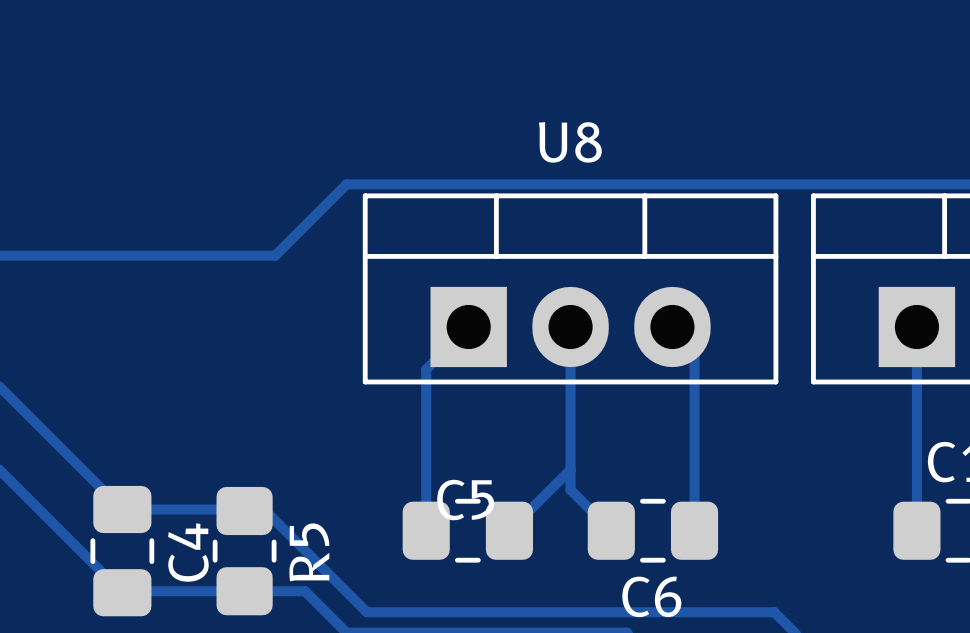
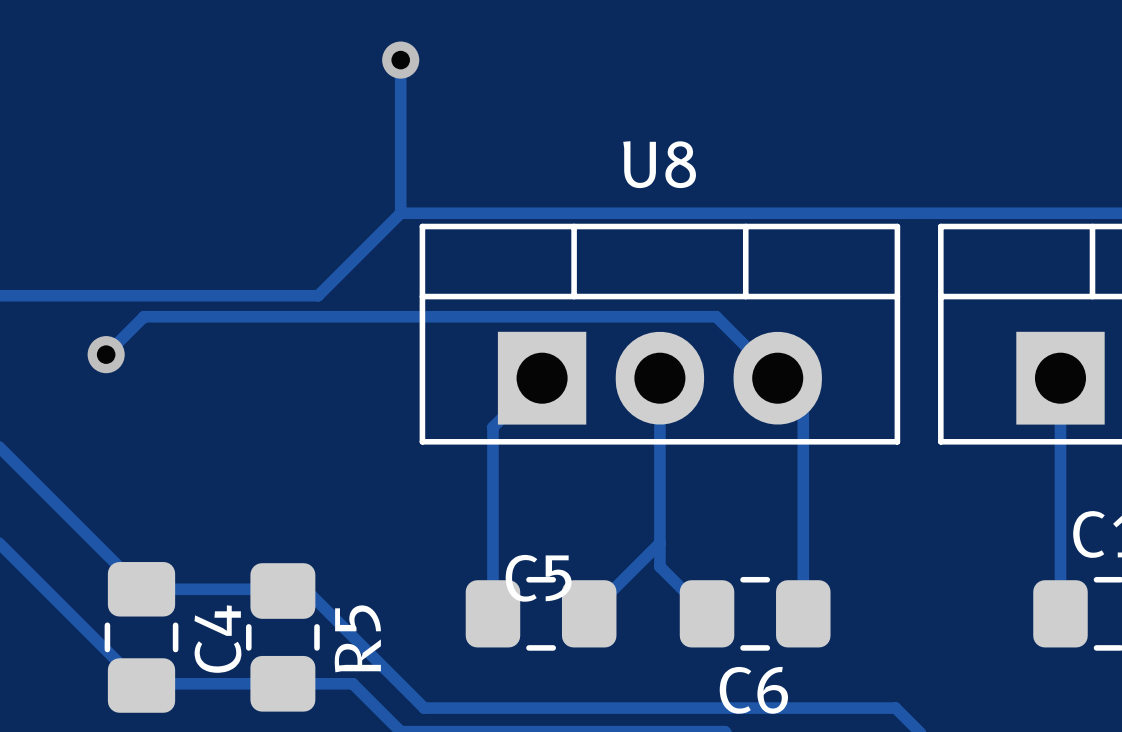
track: none -> (400, 60) (400, 213)
via: none -> (400, 60)
track: none -> (106, 354) (144, 316) (716, 316) (777, 378)
via: none -> (106, 354)

